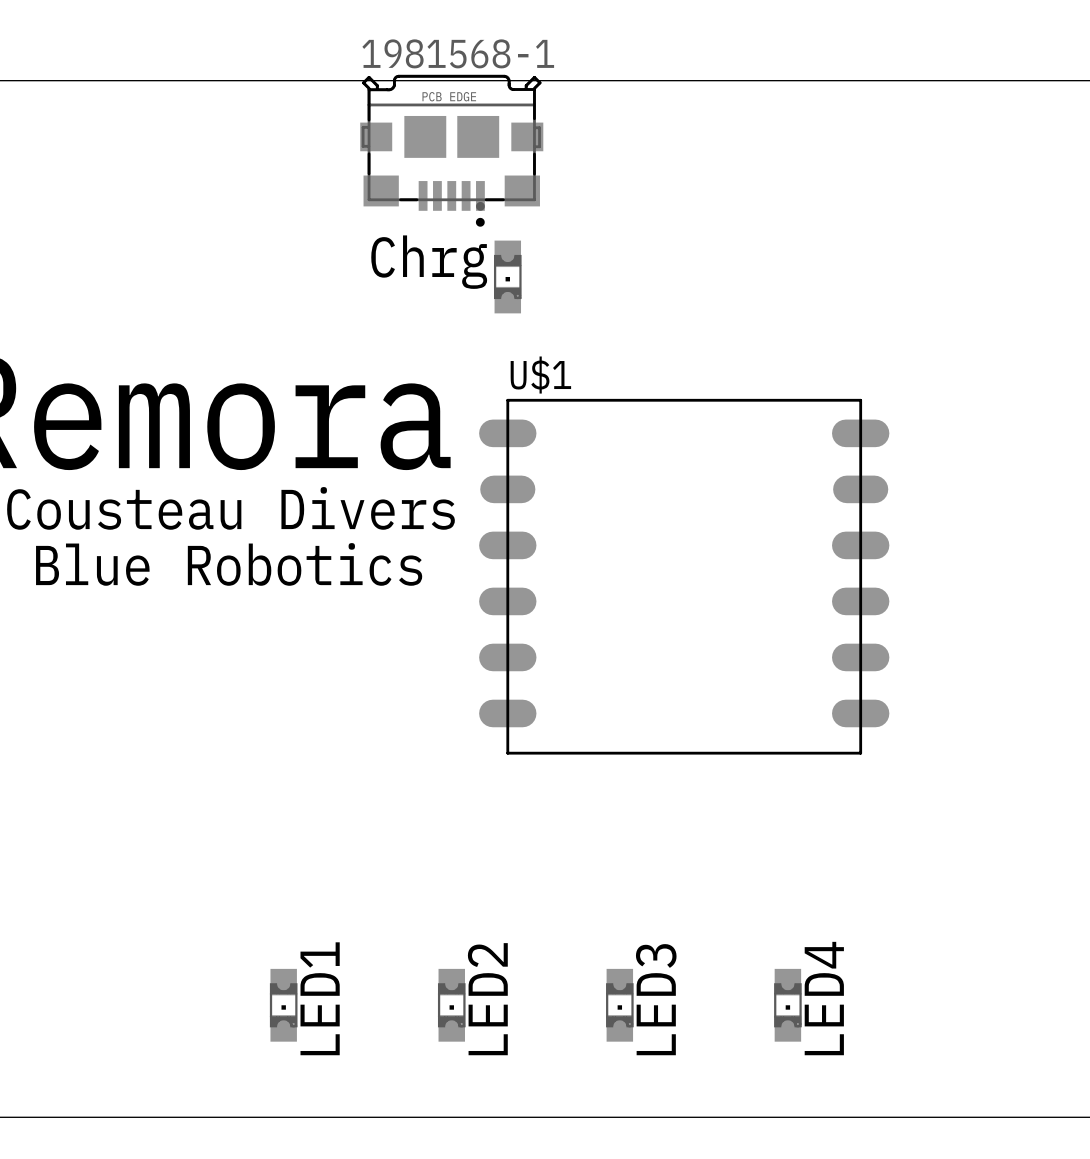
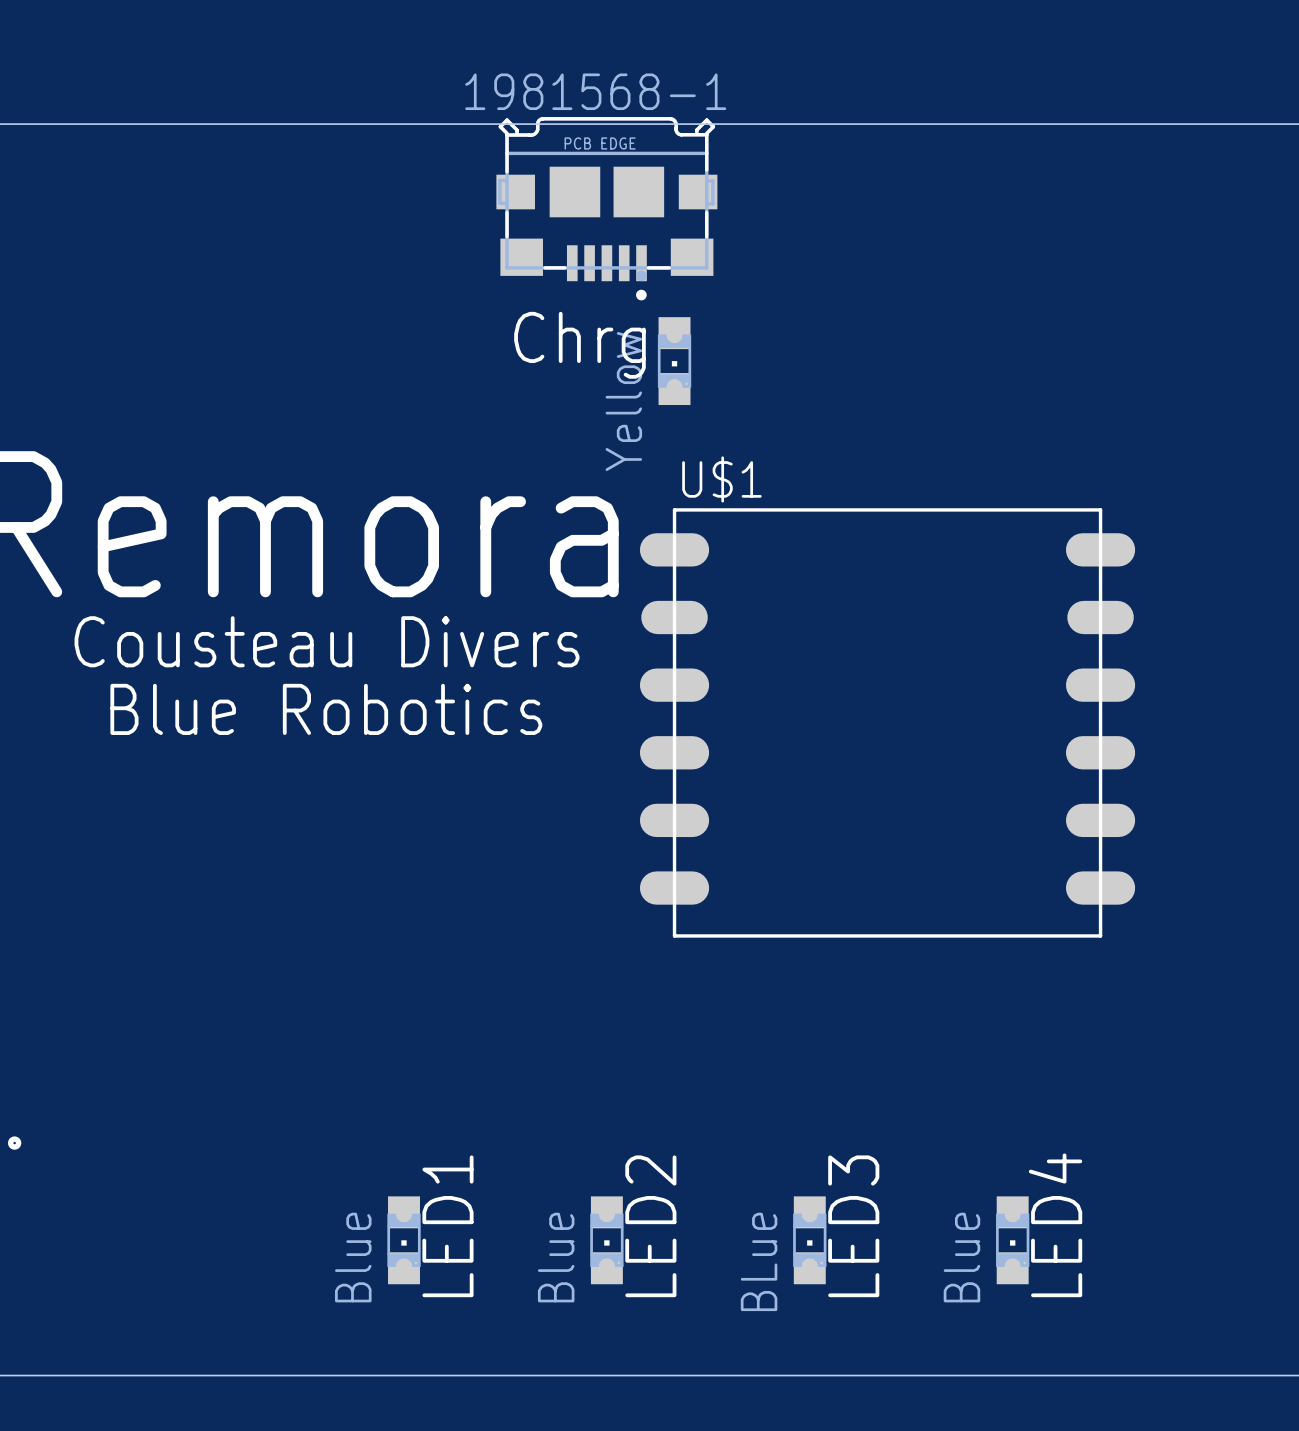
part value: none -> Yellow (623, 401)
part value: none -> Blue (353, 1257)
part value: none -> Blue (556, 1257)
part value: none -> BLue (759, 1261)
part value: none -> Blue (961, 1257)

